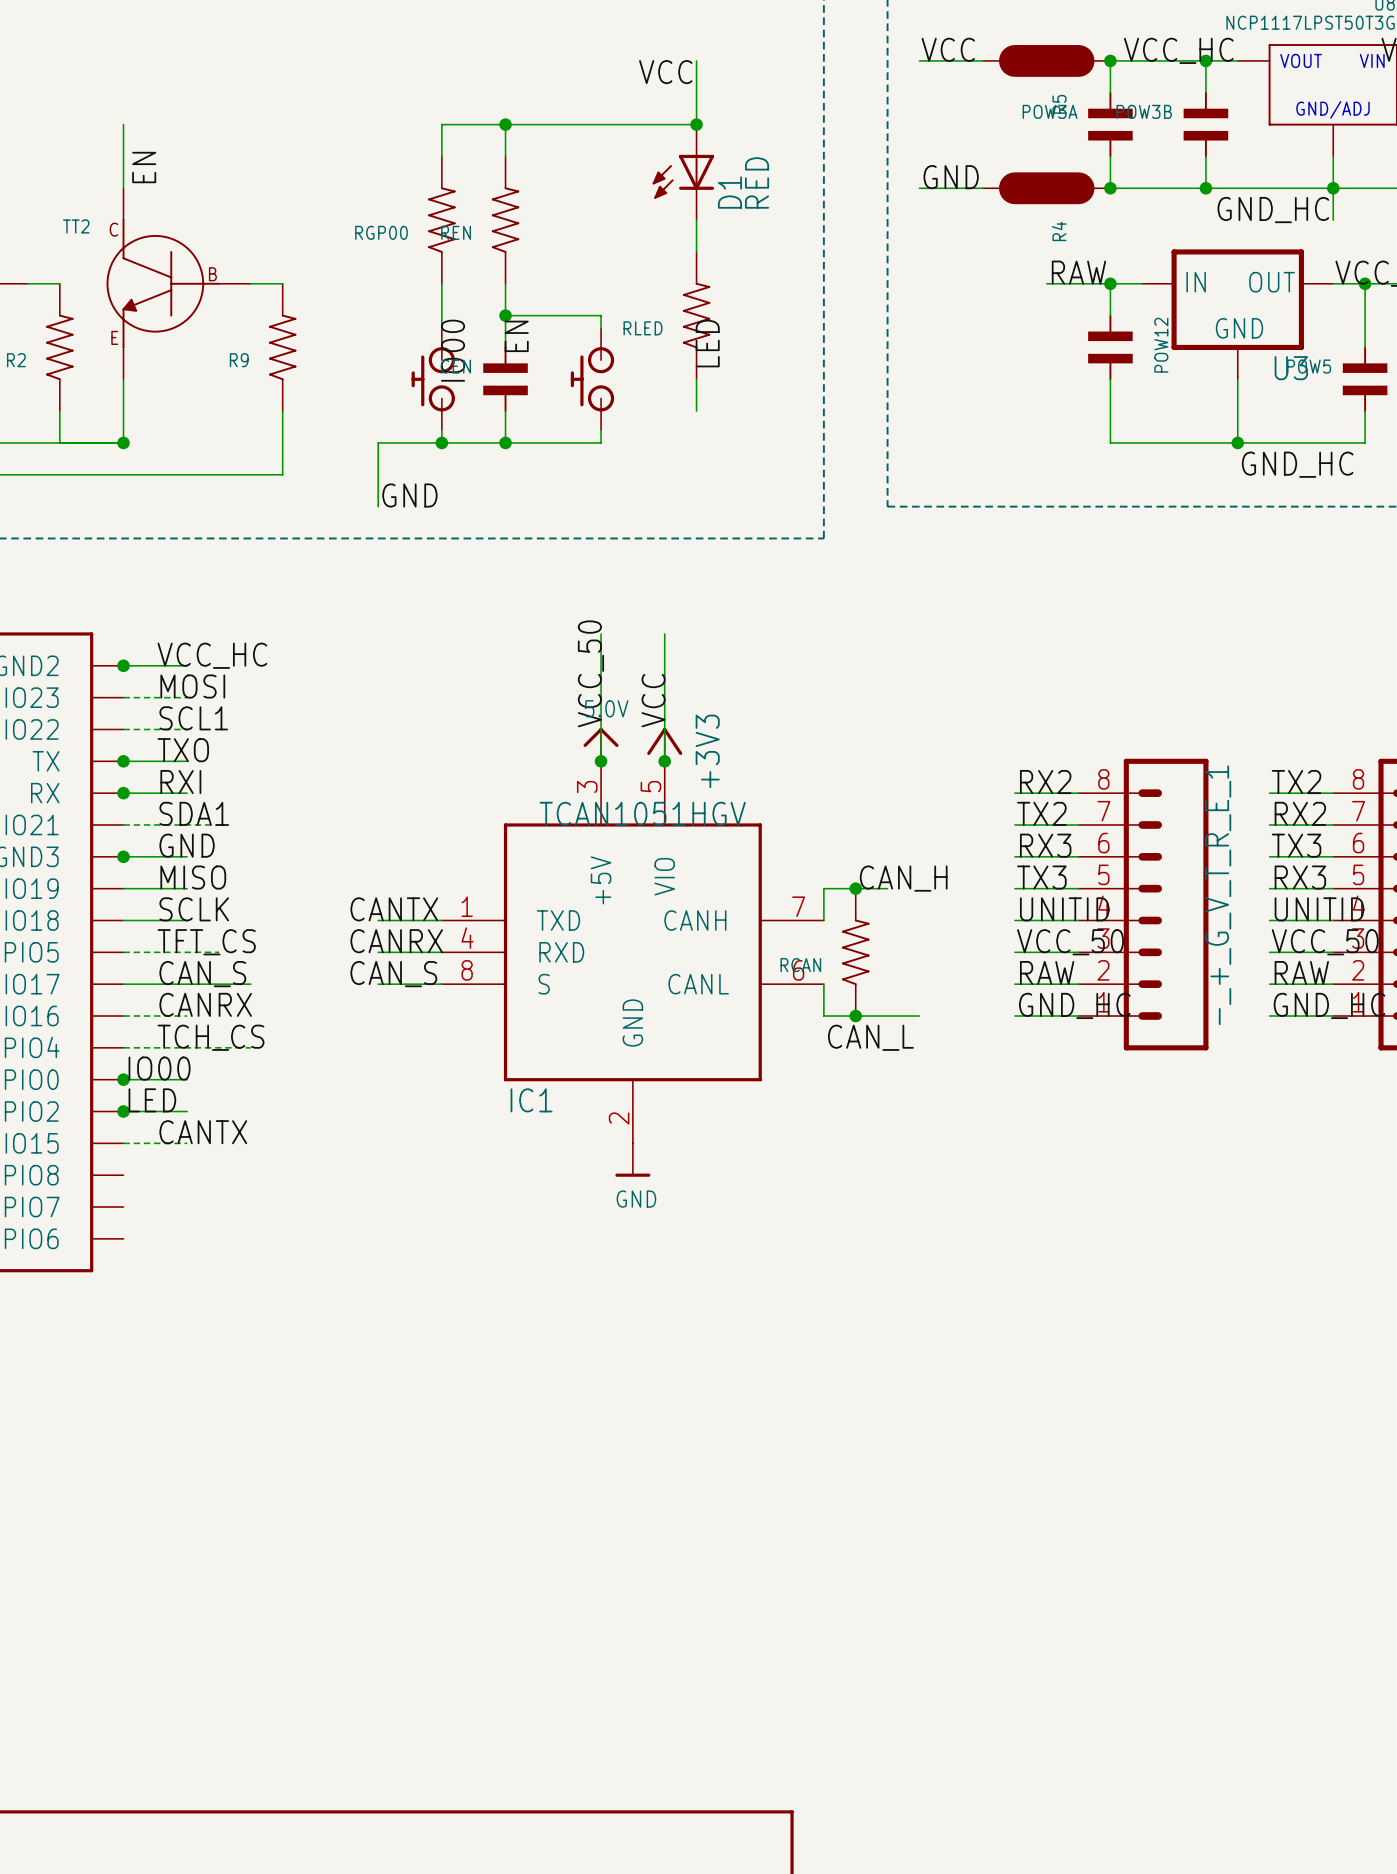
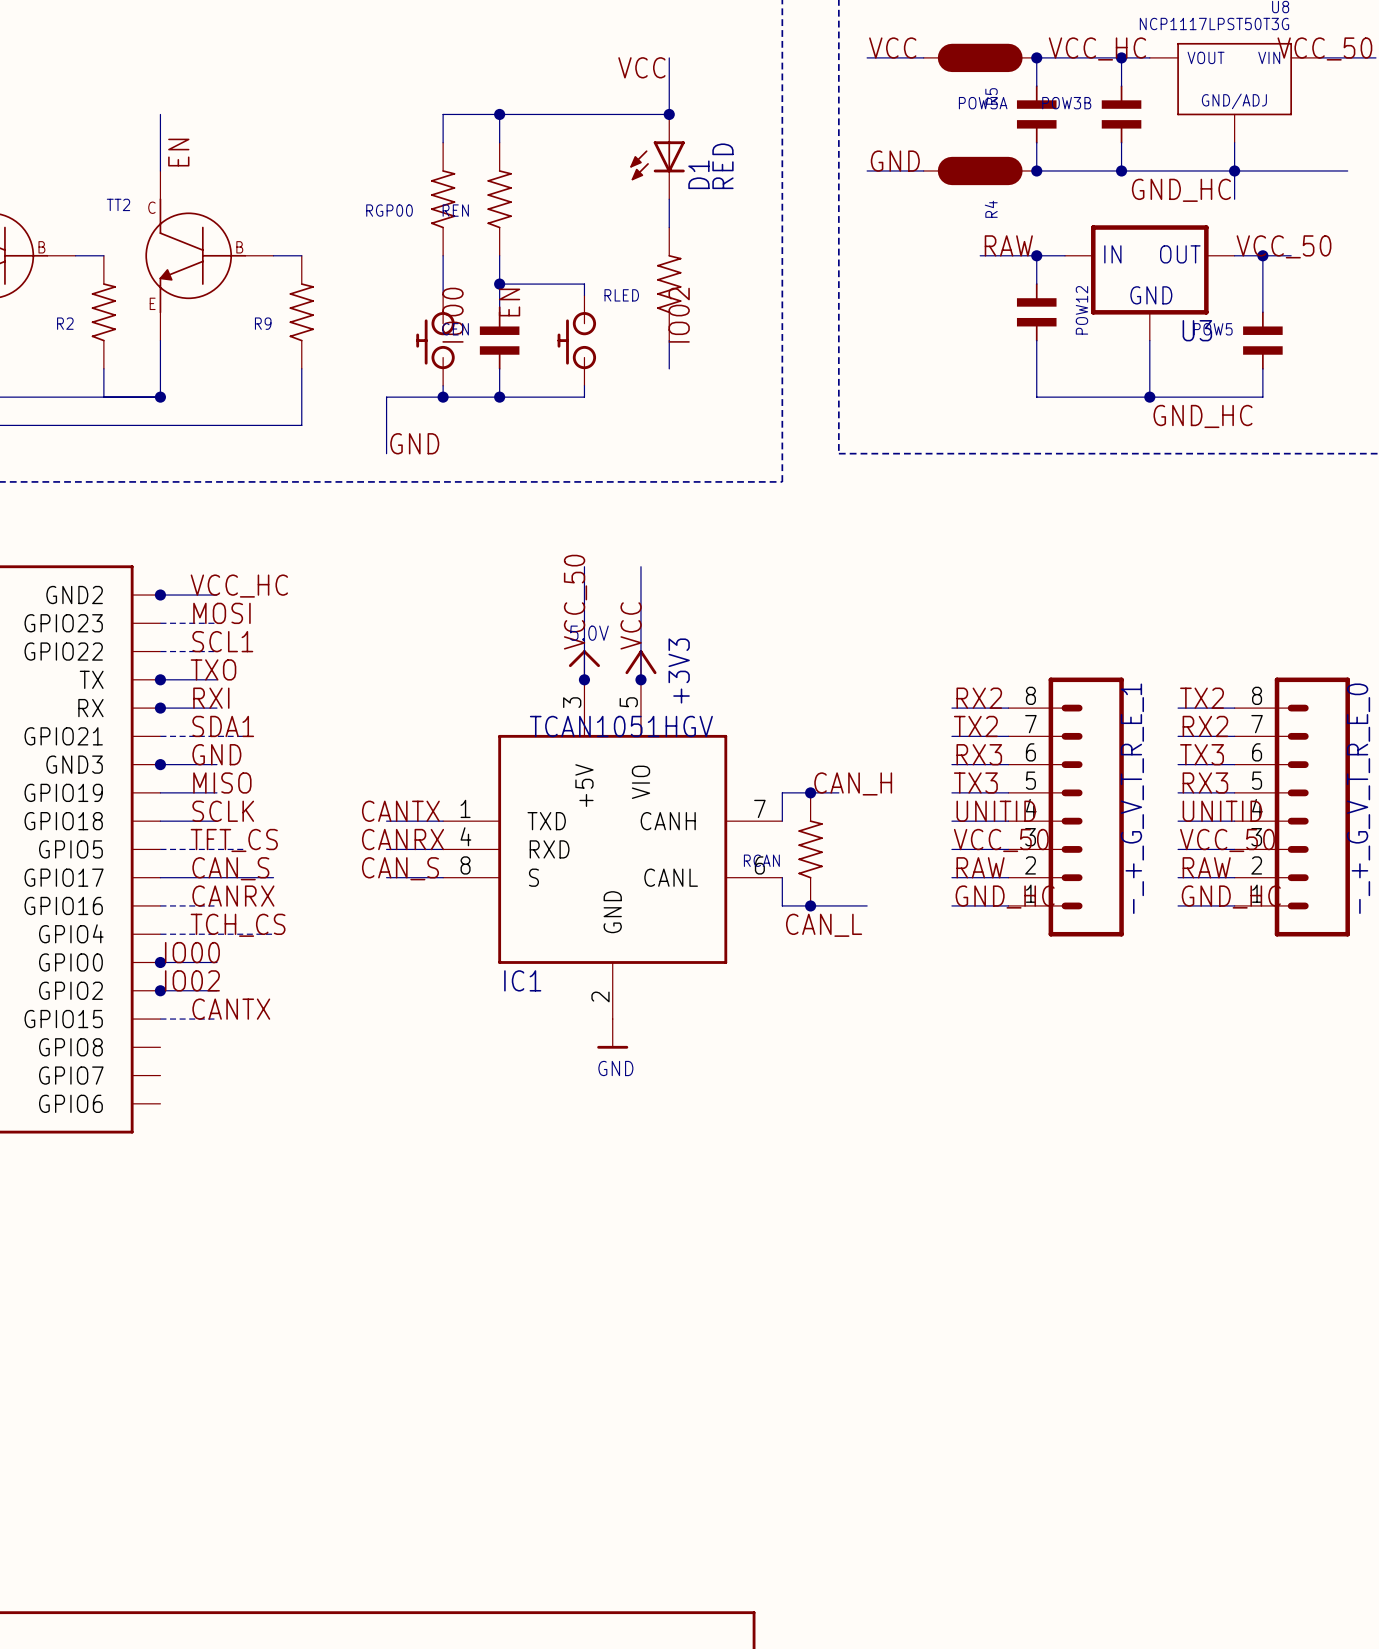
label: LED (707, 343) -> IO02 (679, 315)
label: LED (152, 1100) -> IO02 (192, 980)

